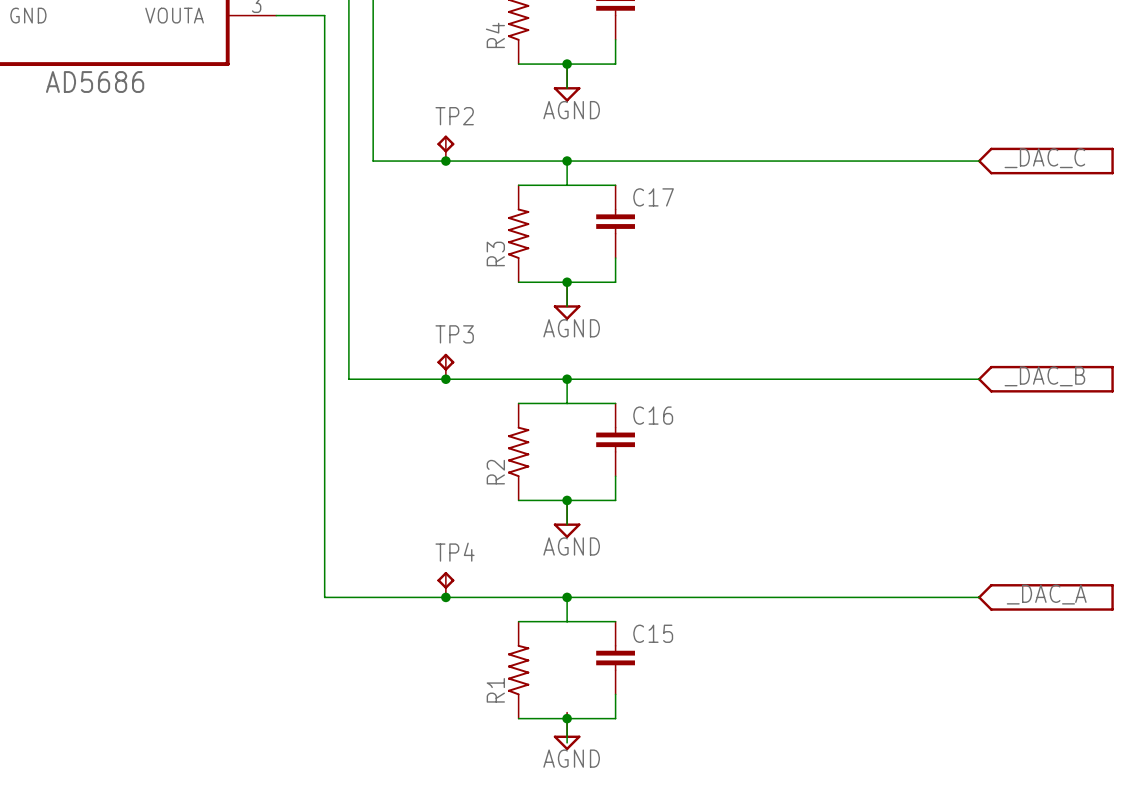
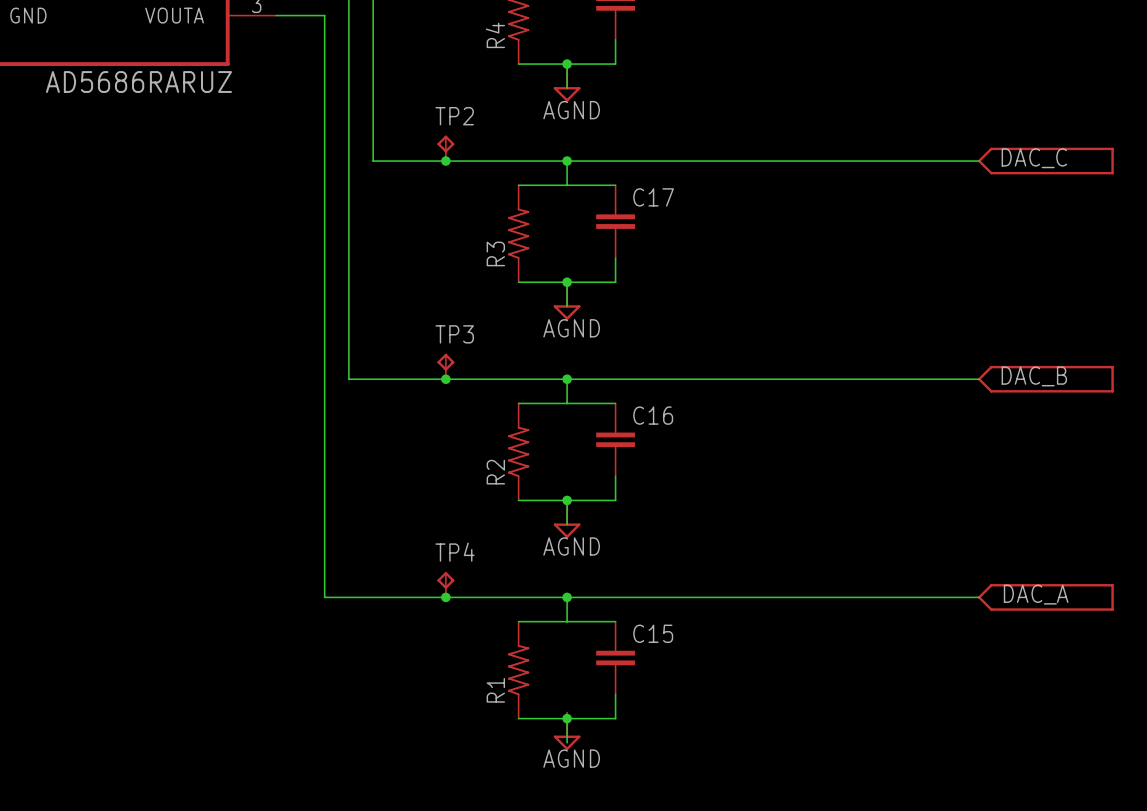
part value: AD5686 (95, 82) -> AD5686RARUZ (138, 82)
label: _DAC_C (1044, 158) -> DAC_C (1034, 158)
label: _DAC_B (1044, 376) -> DAC_B (1034, 376)
label: _DAC_A (1046, 594) -> DAC_A (1036, 594)

